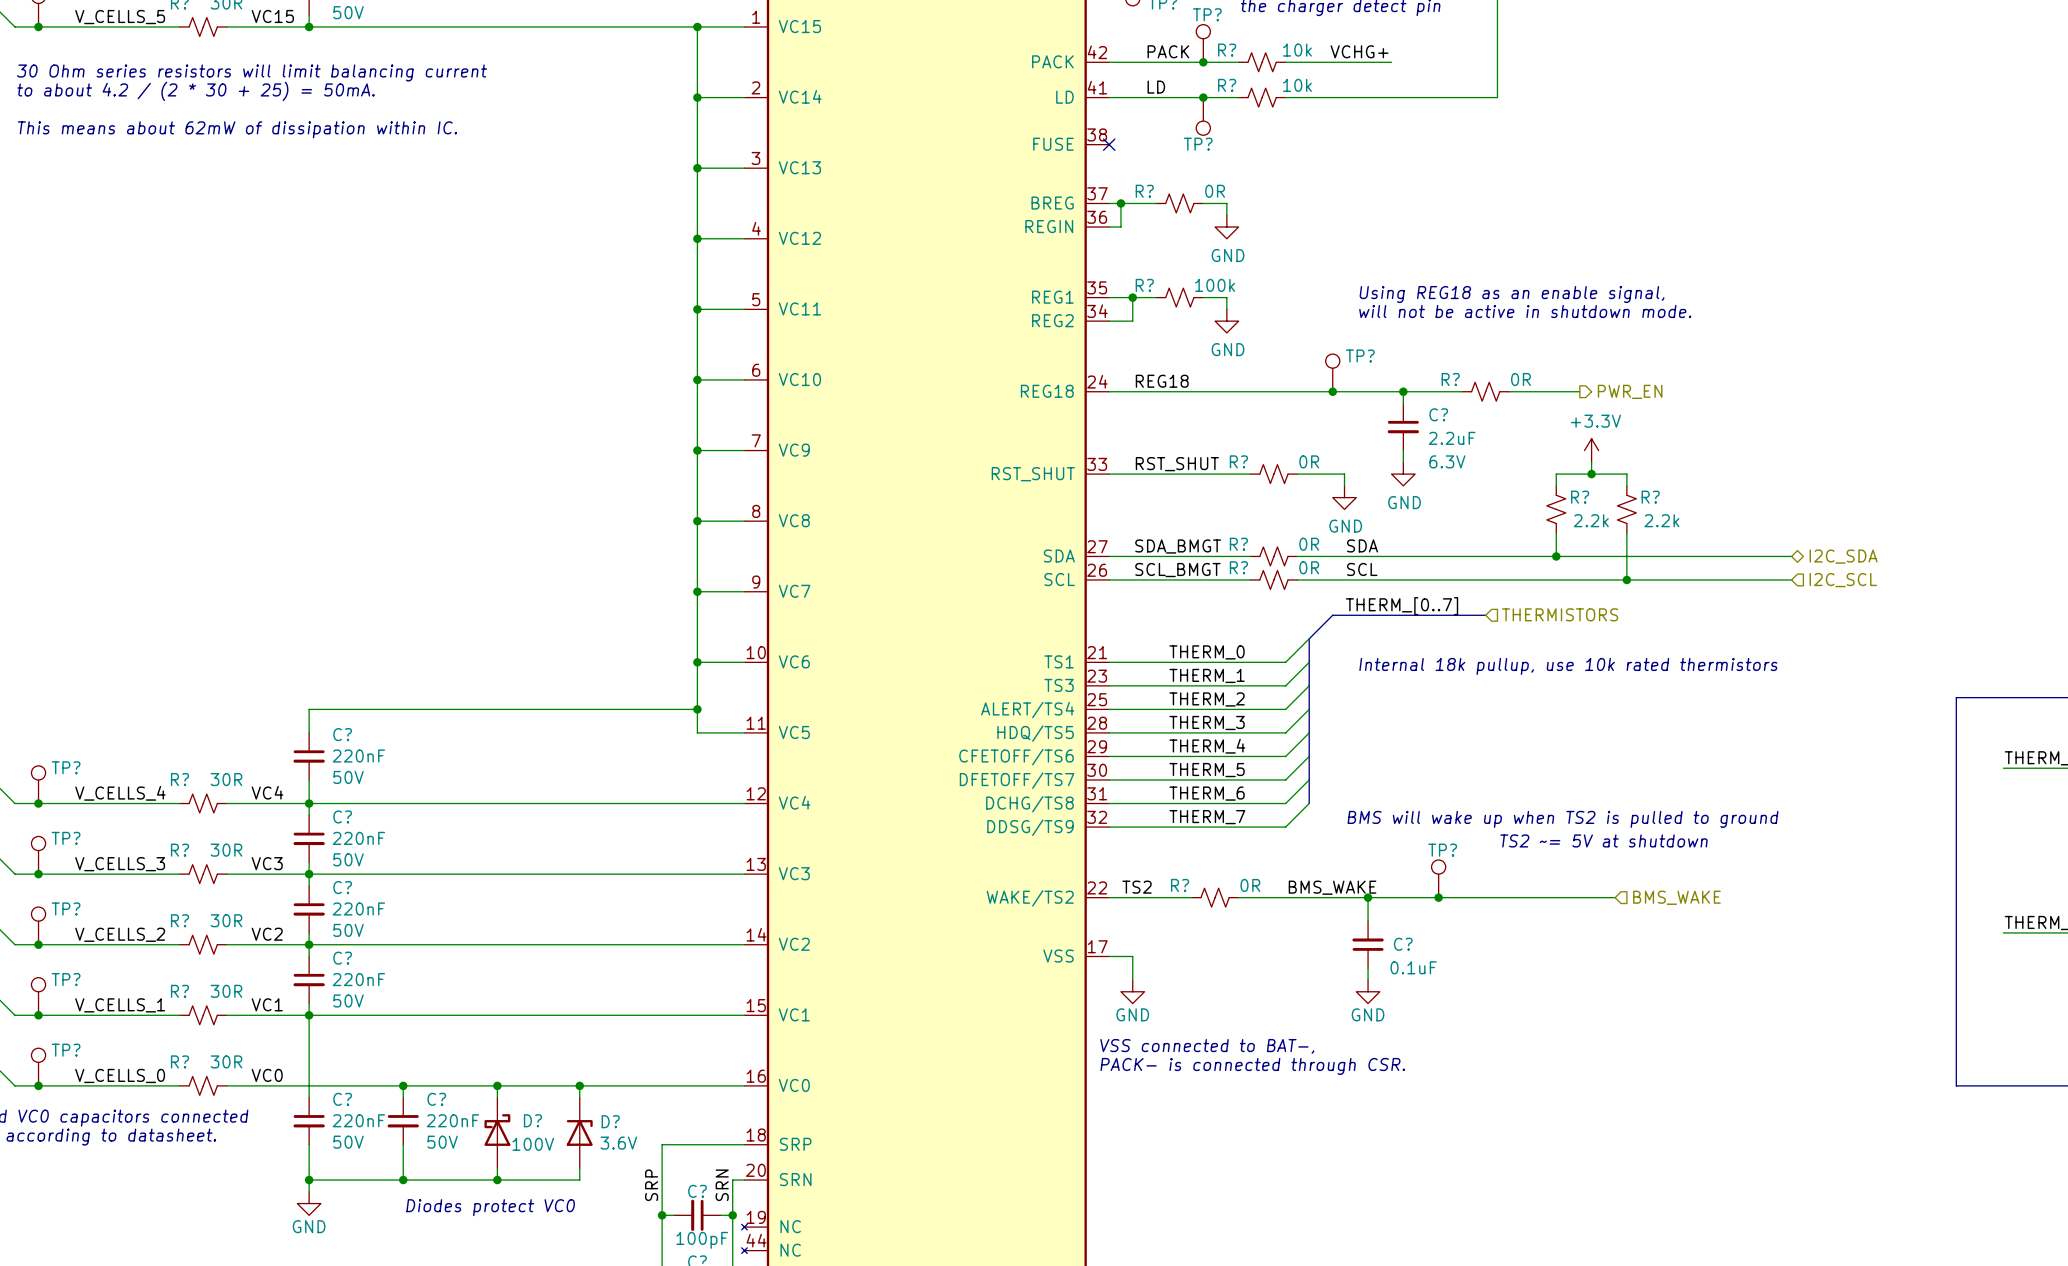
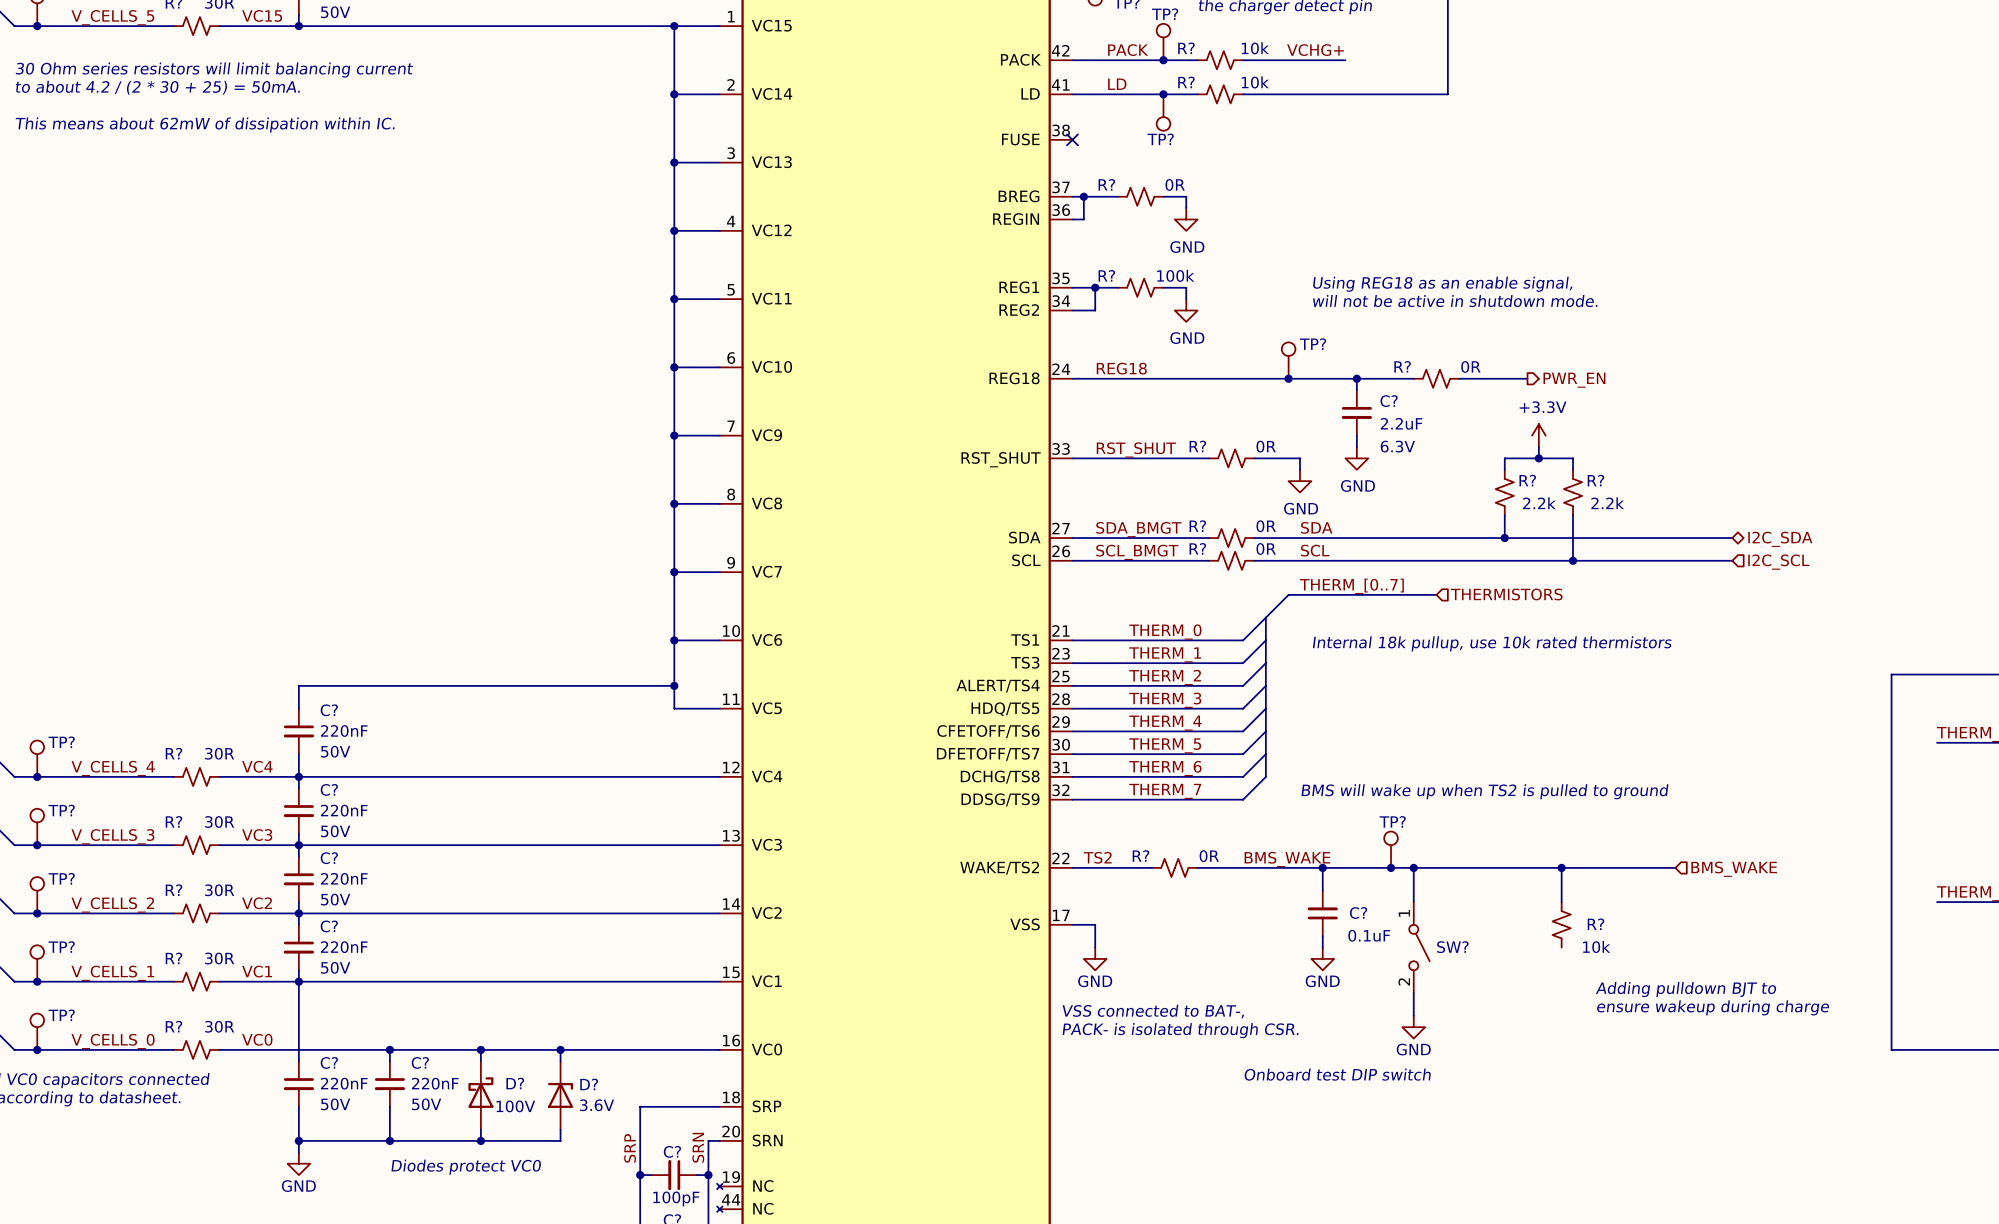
text: TS2 ~= 5V at shutdown (1604, 840) -> none
wire: none -> (1413, 867) (1413, 902)
junction: none -> (1413, 867)
junction: none -> (1561, 867)
hierarchical label position: BMS_WAKE (1676, 897) -> BMS_WAKE (1734, 869)
wire: none -> (1675, 867) (1561, 867) (1561, 902)
R?: none -> 10k (1561, 924)
SW?: none -> (1419, 947)
text: none -> Adding pulldown BJT to (1686, 989)
wire: none -> (1413, 993) (1413, 1015)
text: none -> ensure wakeup during charge (1713, 1007)
power symbol: none -> GND (1413, 1027)
text: PACK- is connected through CSR. (1252, 1066) -> PACK- is isolated through CSR. (1180, 1030)
text: none -> Onboard test DIP switch (1337, 1074)

